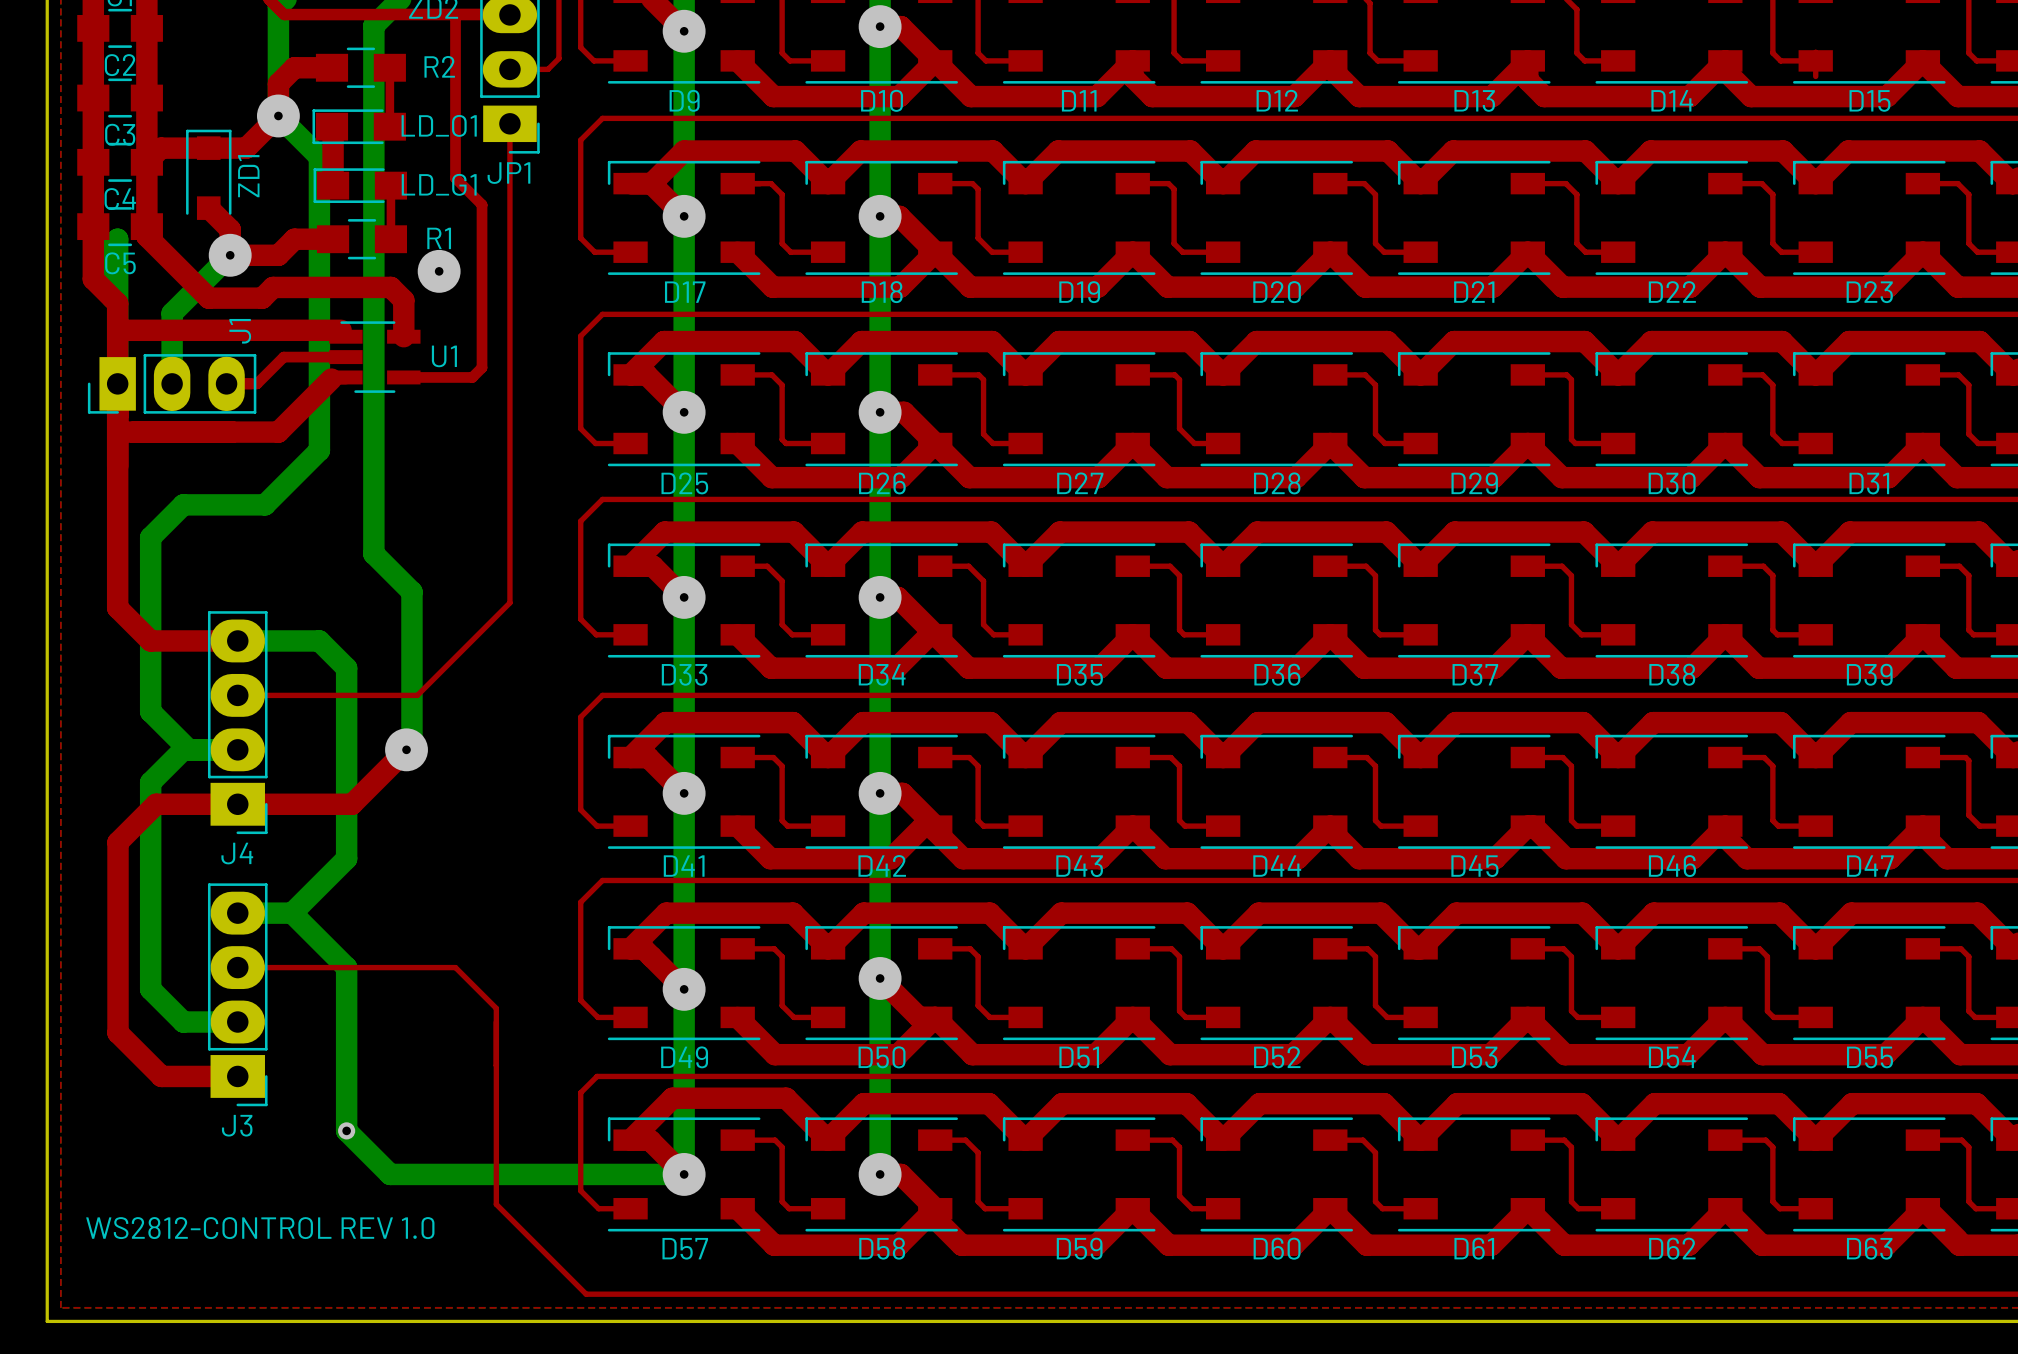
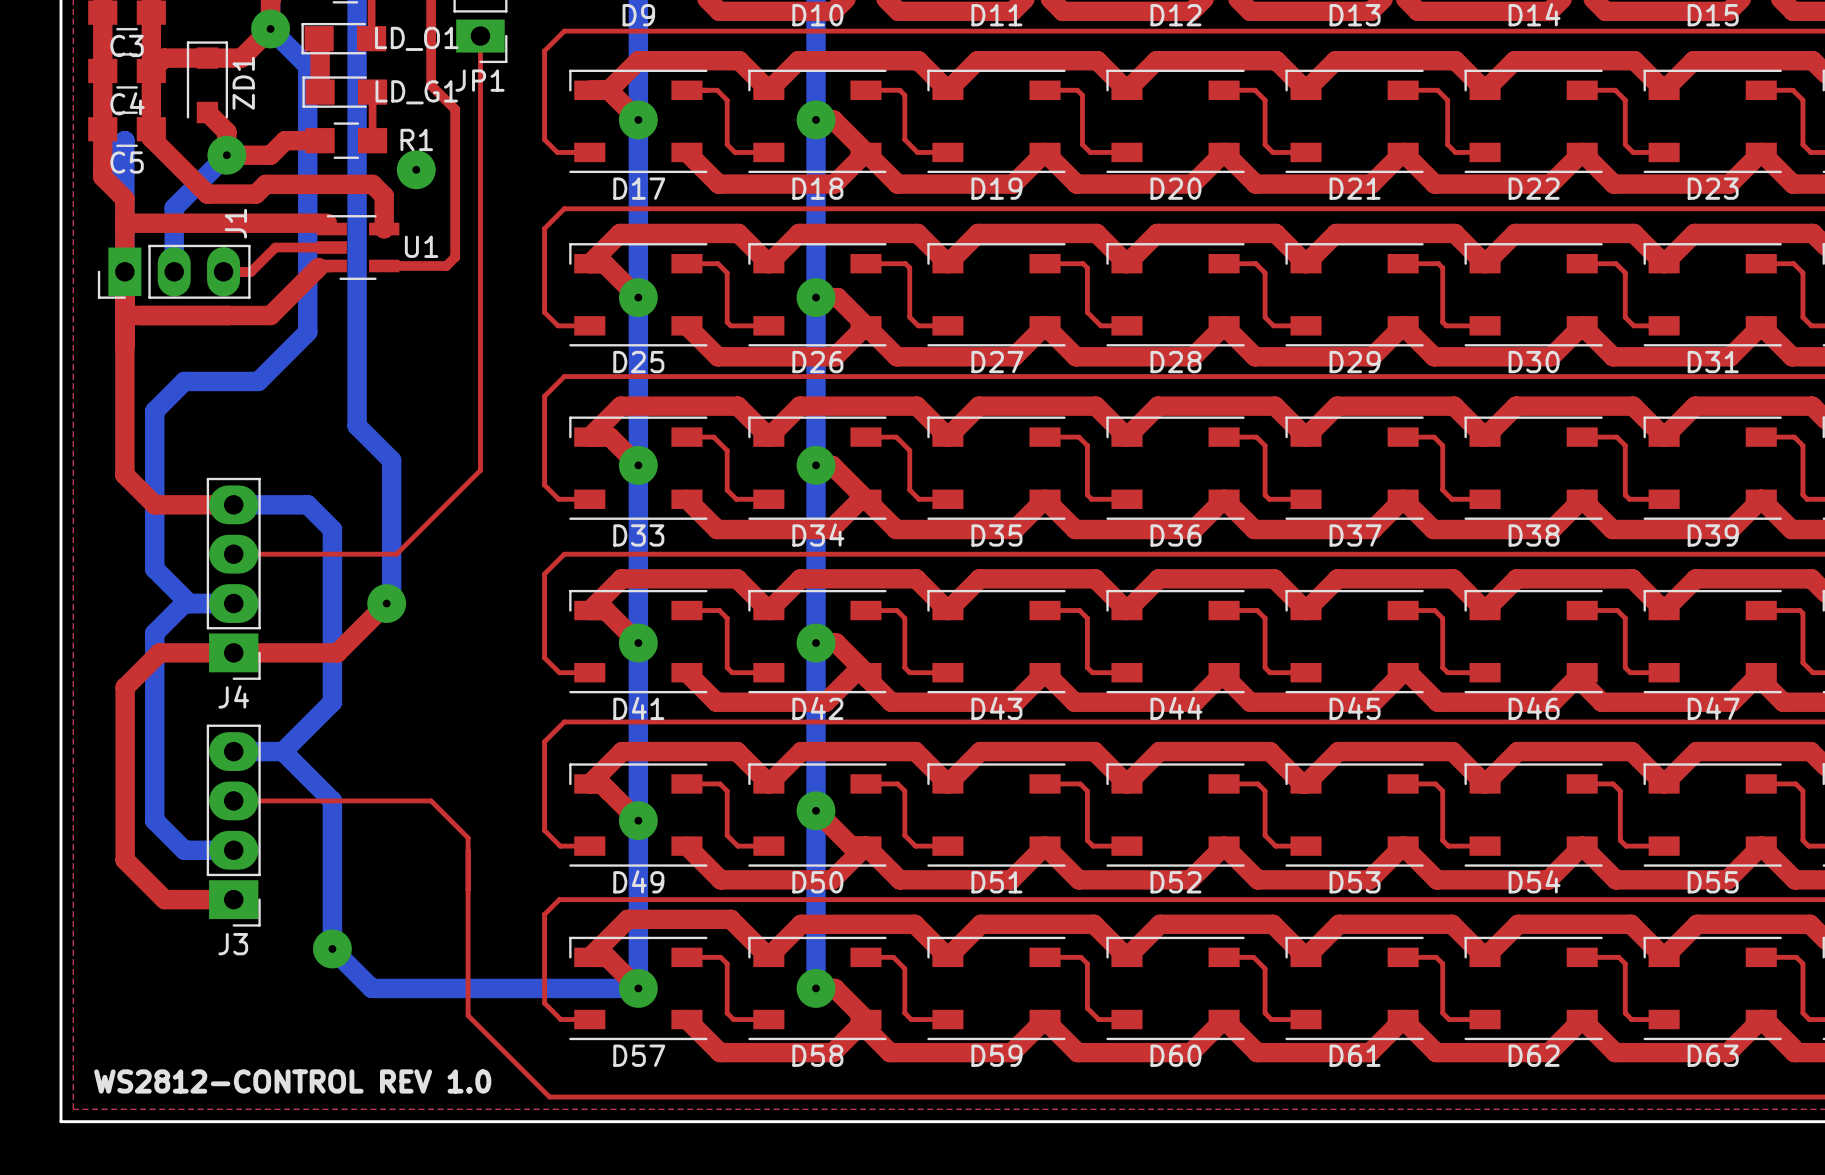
via size: [338, 1122, 356, 1140] -> [312, 929, 352, 969]
text position: WS2812-CONTROL REV 1.0 (260, 1228) -> WS2812-CONTROL REV 1.0 (292, 1081)

